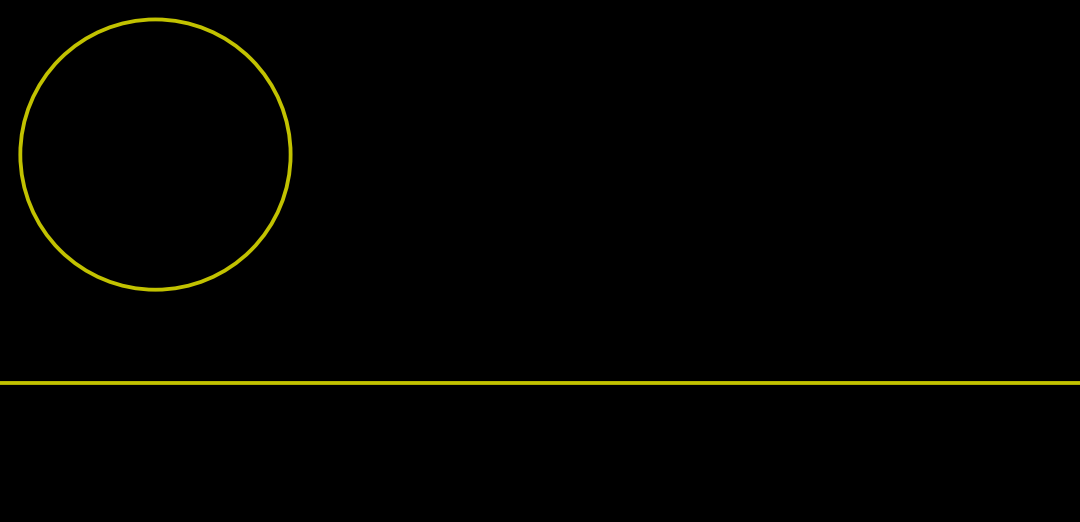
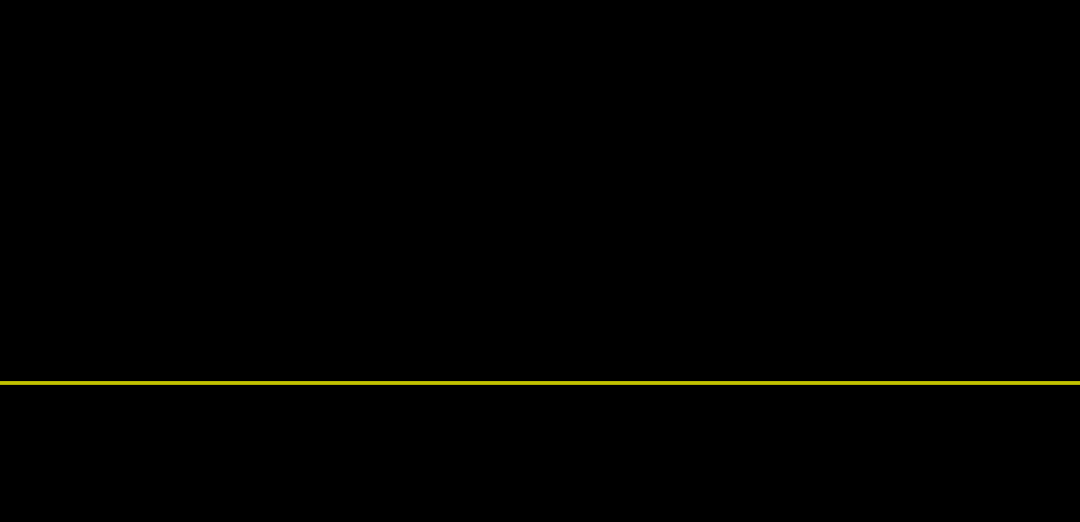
round board edge: [18, 17, 293, 292] -> none

